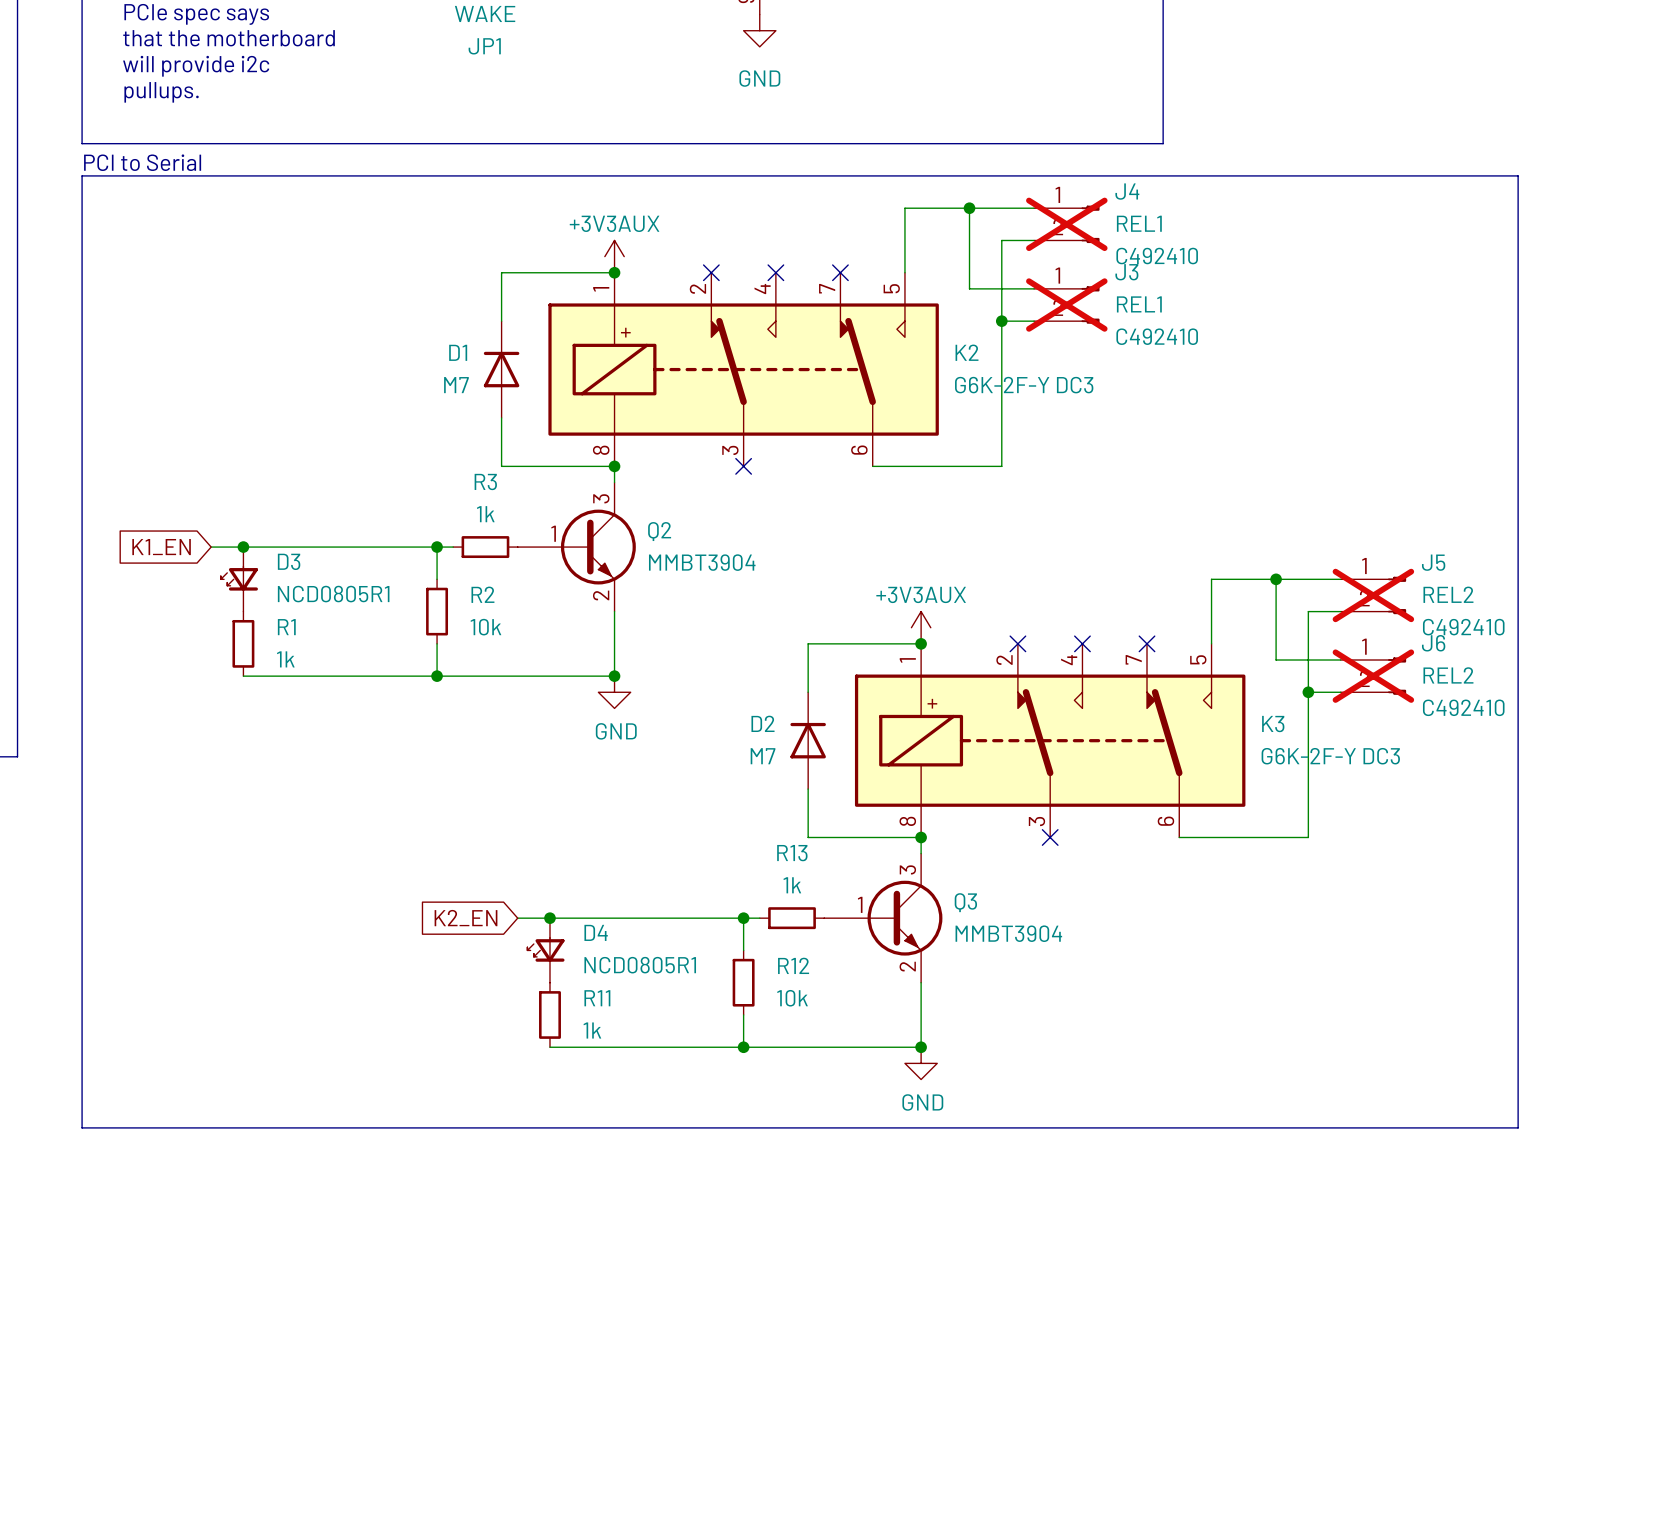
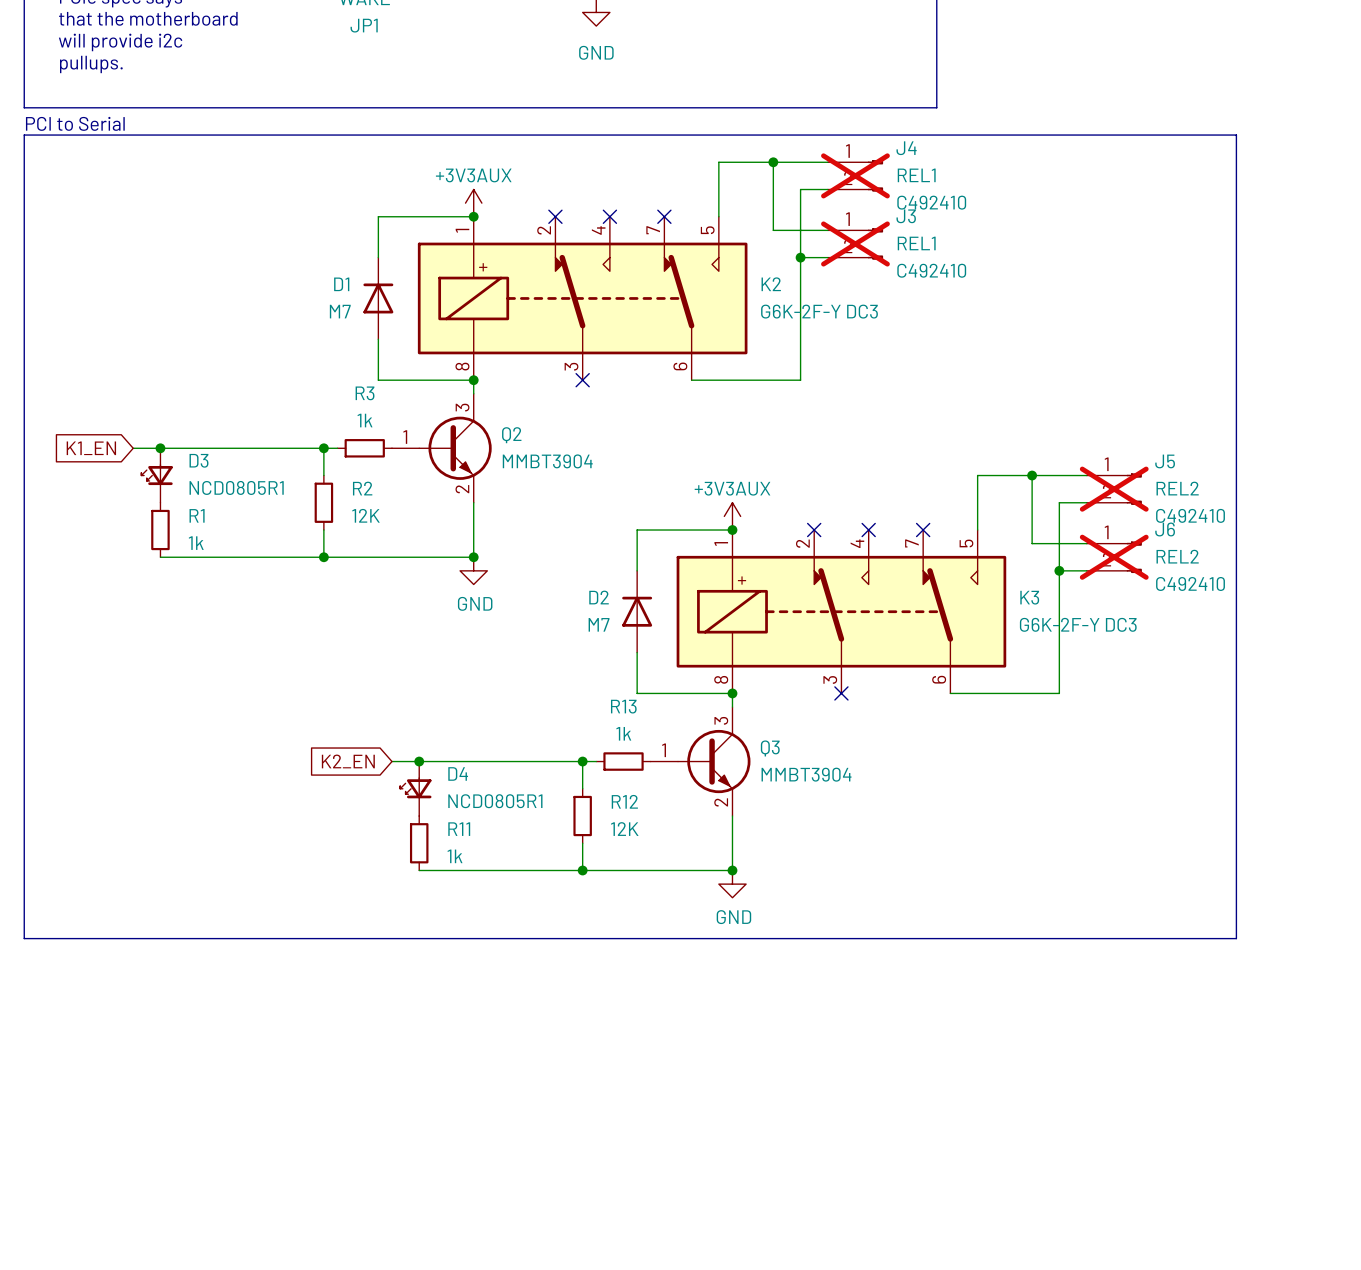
Q2 symbol: [517, 482, 636, 612] -> [391, 393, 492, 503]
R2 value: 10k (485, 627) -> 12K (365, 515)
Q3 symbol: [824, 853, 943, 983] -> [650, 707, 751, 817]
R12 value: 10k (792, 998) -> 12K (624, 829)

